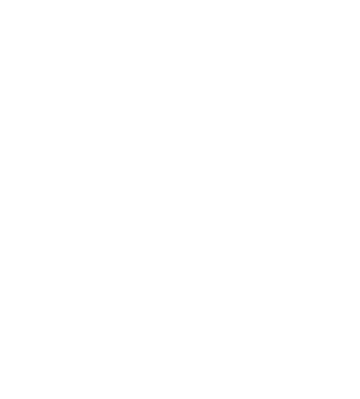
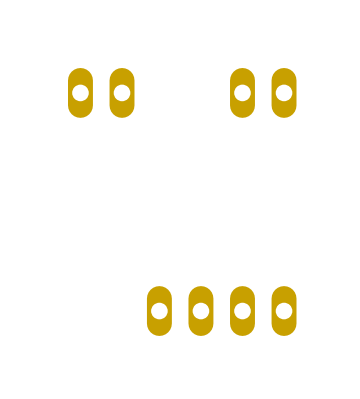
part: none -> (101, 92)
part: none -> (263, 92)
part: none -> (221, 311)

